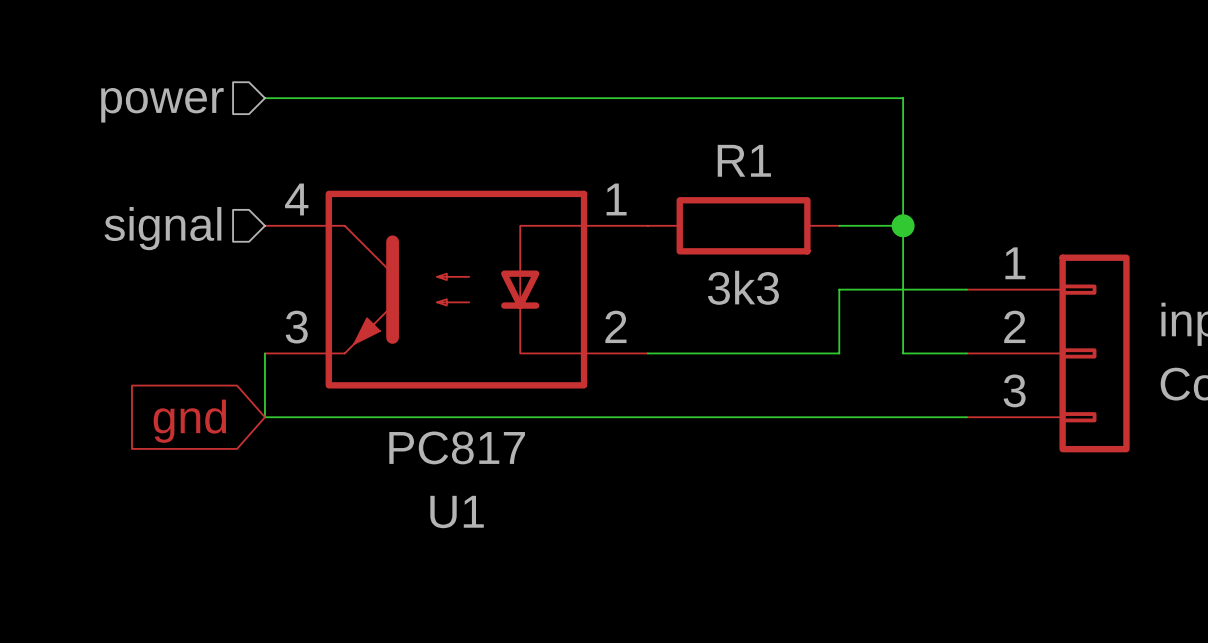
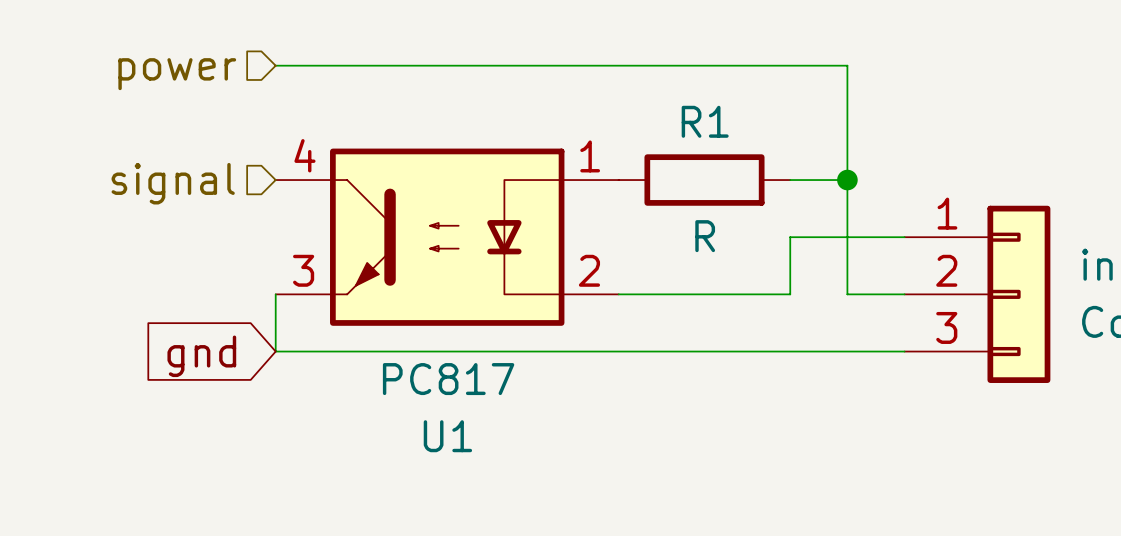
R1 value: 3k3 (743, 287) -> R (705, 236)

